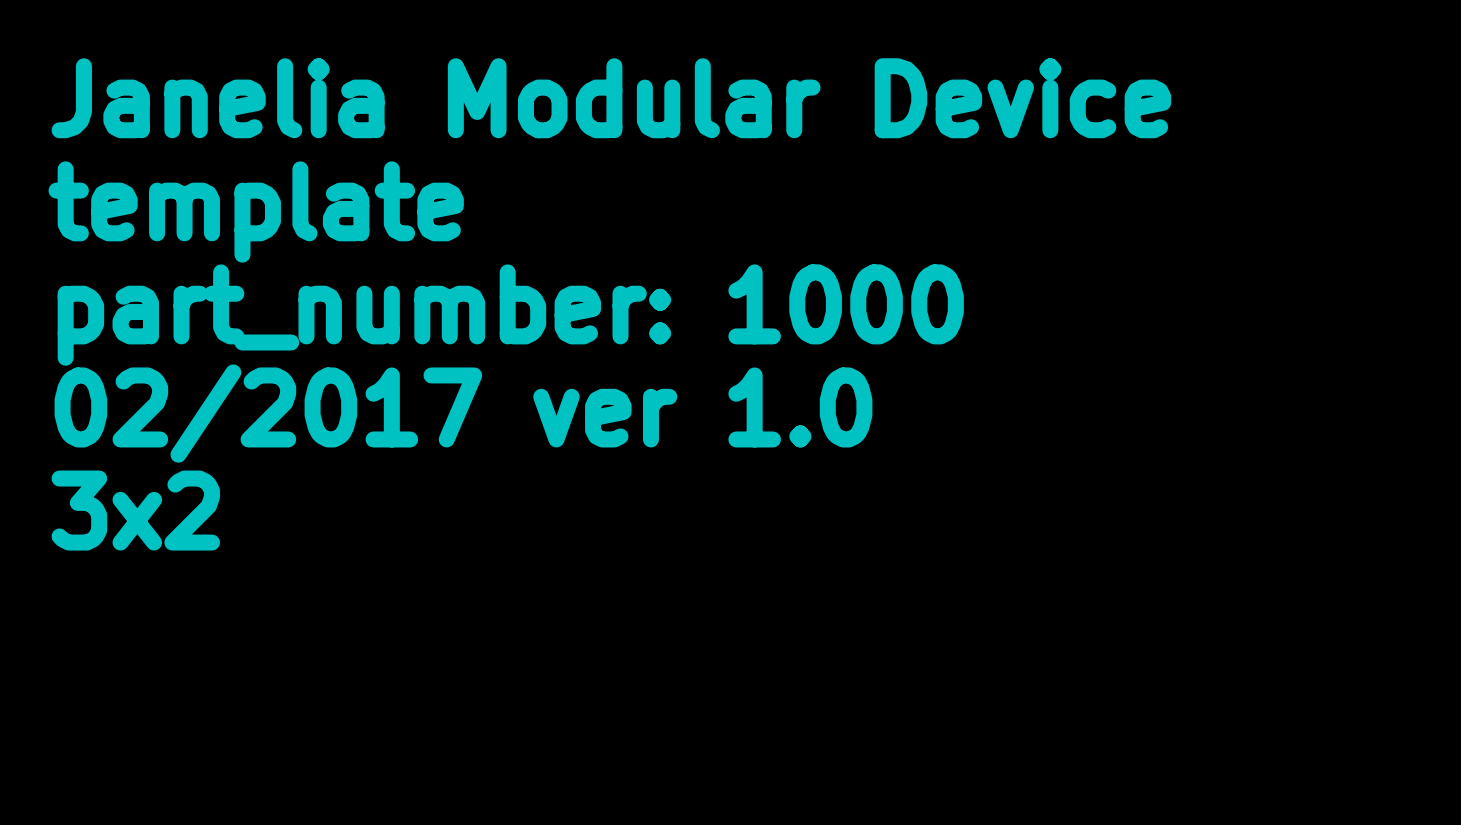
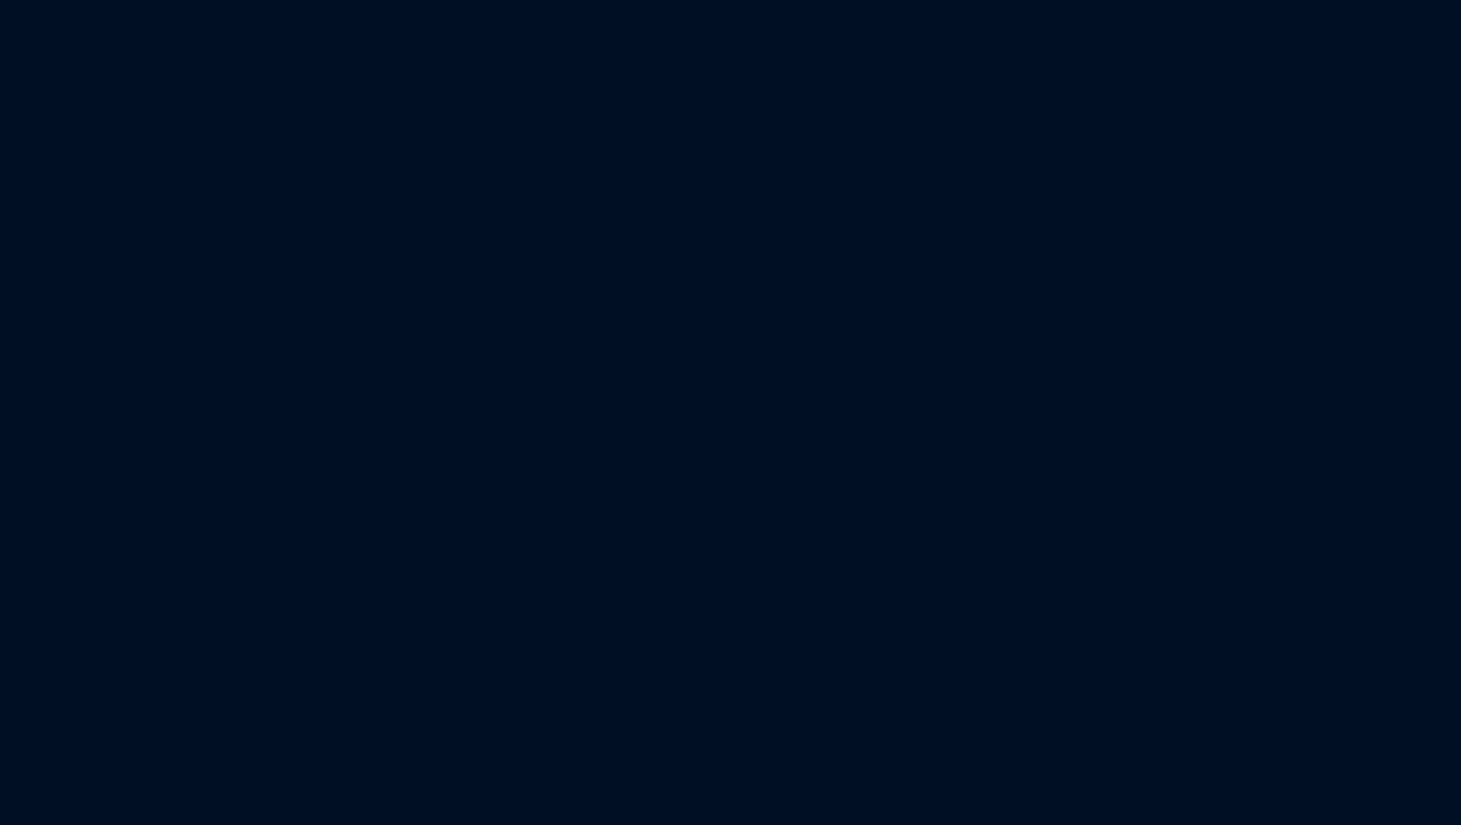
text: Janelia Modular Device (611, 98) -> none
text: template (256, 211) -> none
text: part_number: 1000 (510, 315) -> none
text: 02/2017 ver 1.0 (463, 413) -> none
text: 3x2 (135, 510) -> none

